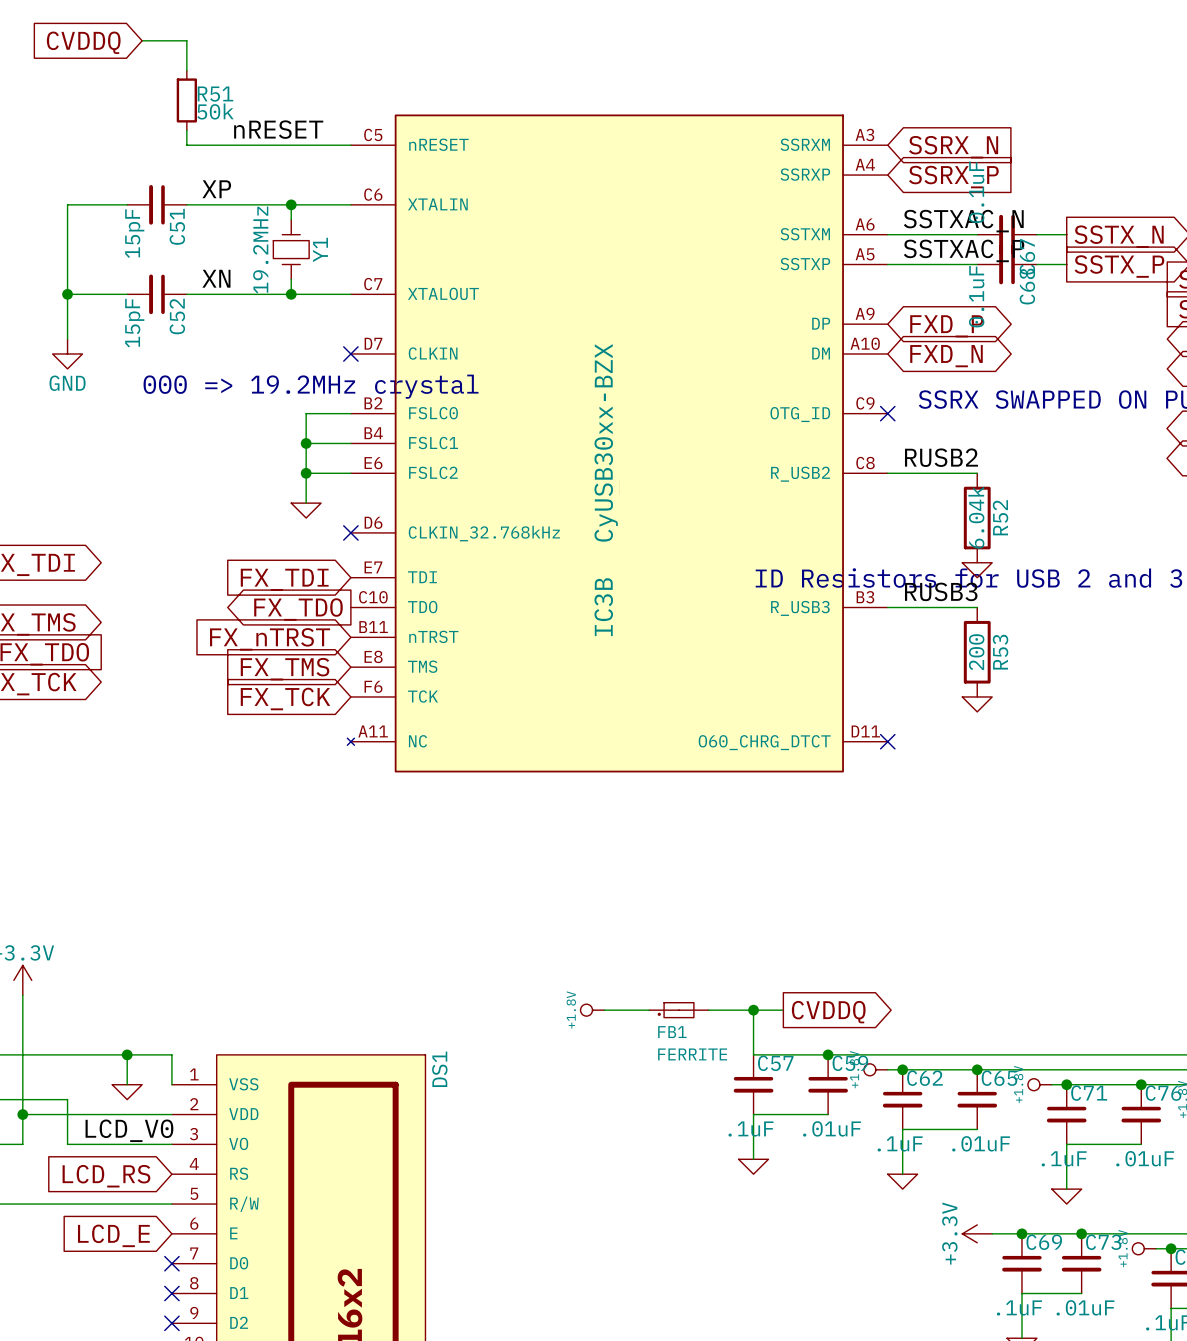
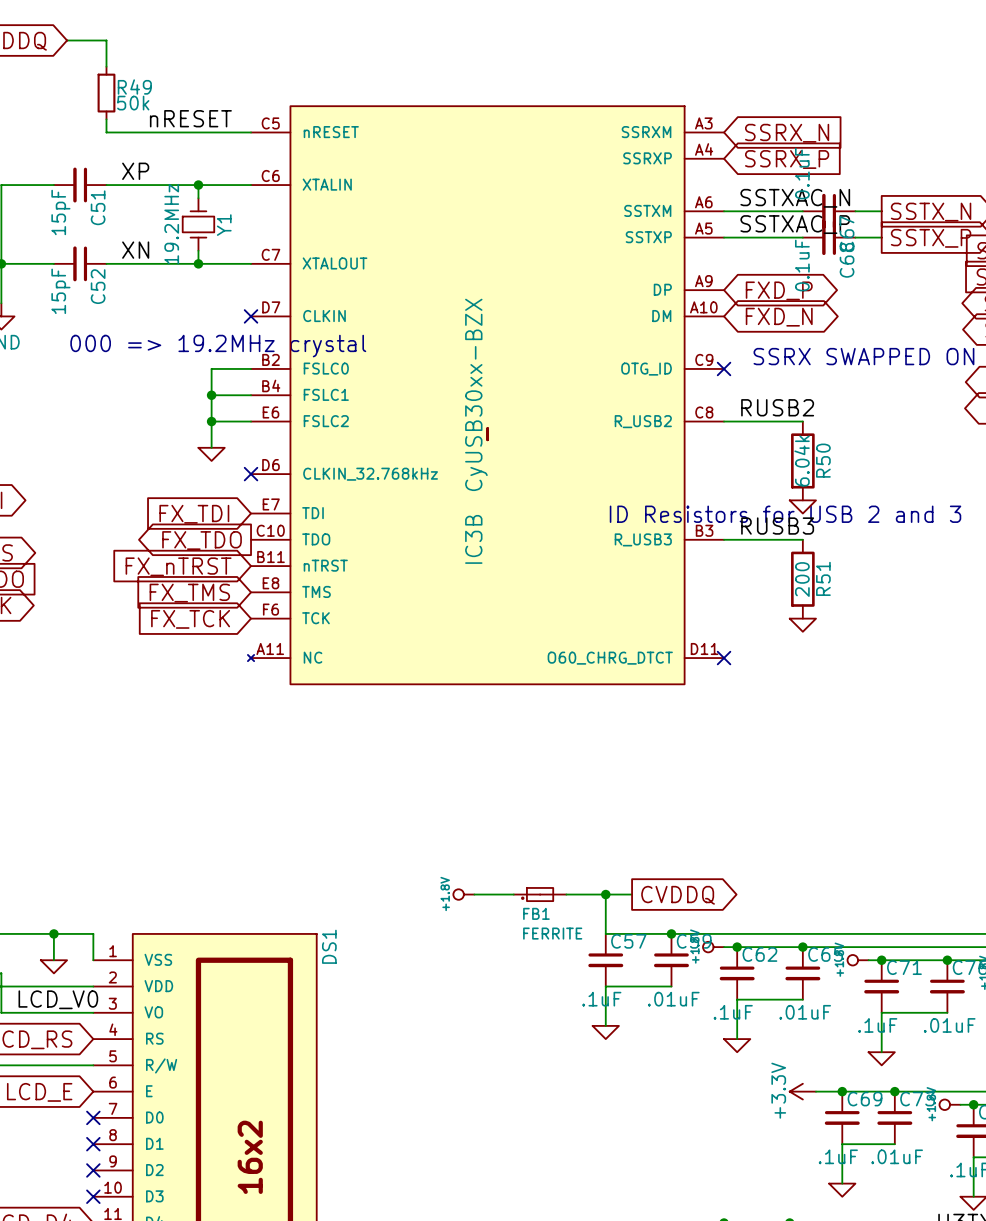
R51 name: R51 (215, 94) -> R49 (134, 87)
R52 name: R52 (1000, 517) -> R50 (823, 460)
R53 name: R53 (1000, 652) -> R51 (823, 578)

